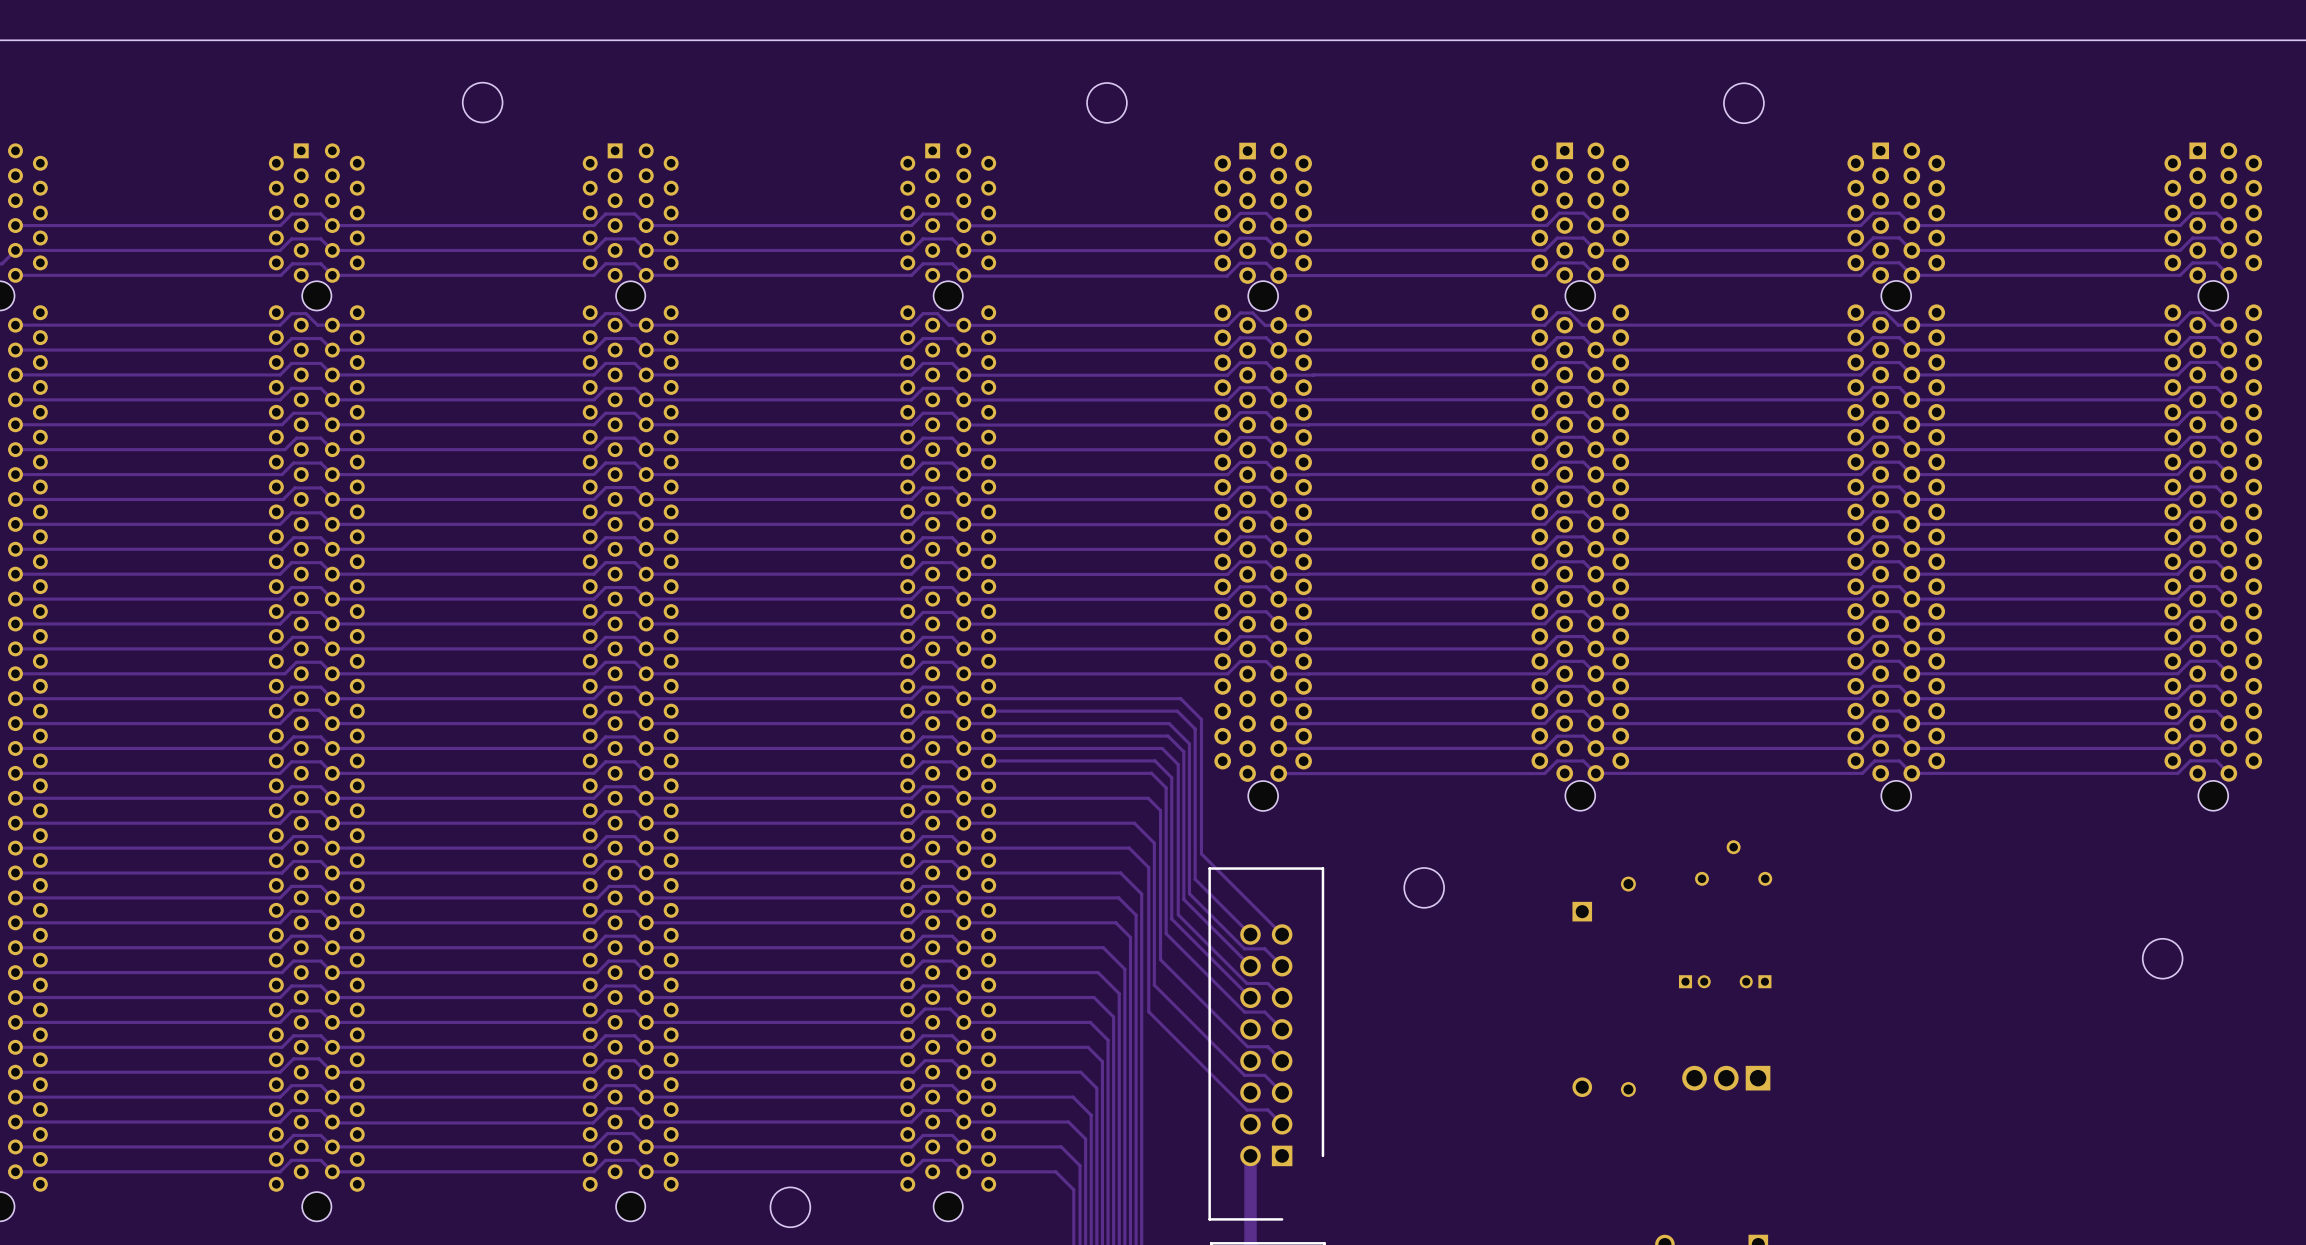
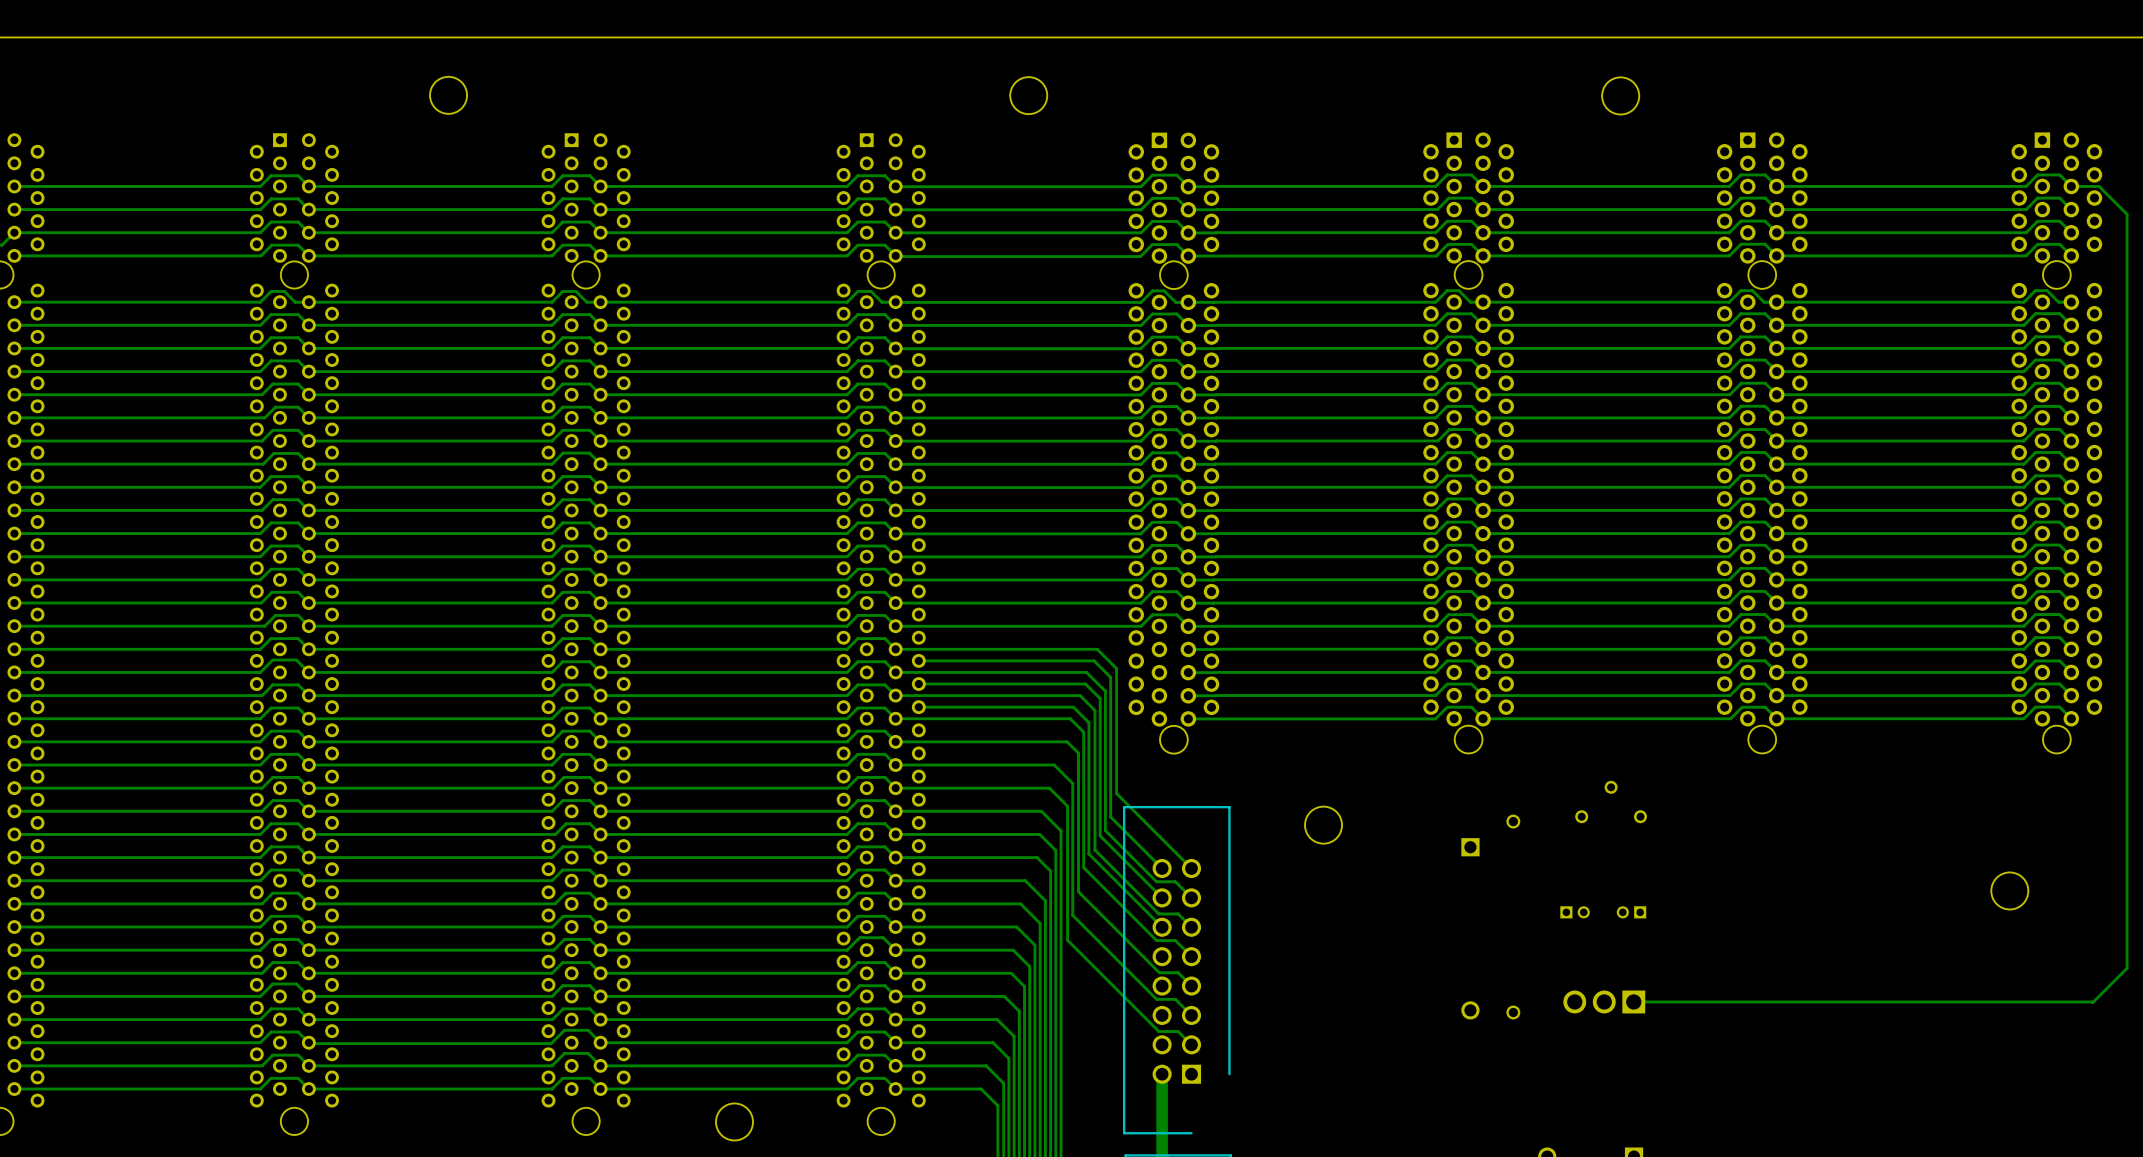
track: none -> (14, 186) (260, 186) (271, 175) (298, 175) (308, 186) (552, 186) (562, 175) (589, 175) (600, 186) (847, 186) (857, 175) (884, 175) (895, 186) (1140, 186) (1152, 175) (1176, 175) (1188, 186) (1435, 186) (1447, 174) (1471, 174) (1483, 186) (1729, 186) (1740, 174) (1765, 174) (1776, 186) (2026, 186) (2037, 174) (2059, 174) (2071, 186) (2099, 186) (2127, 214) (2127, 968) (2092, 1002) (1633, 1001)

